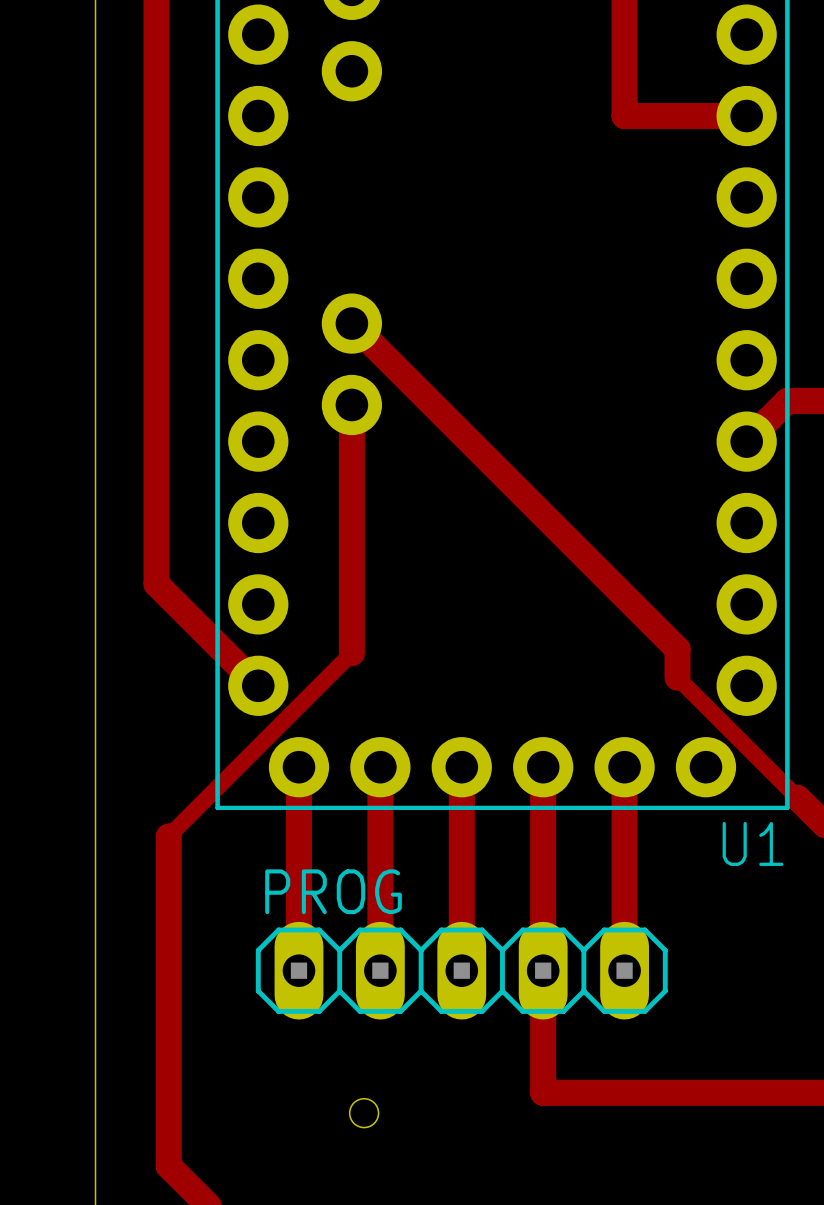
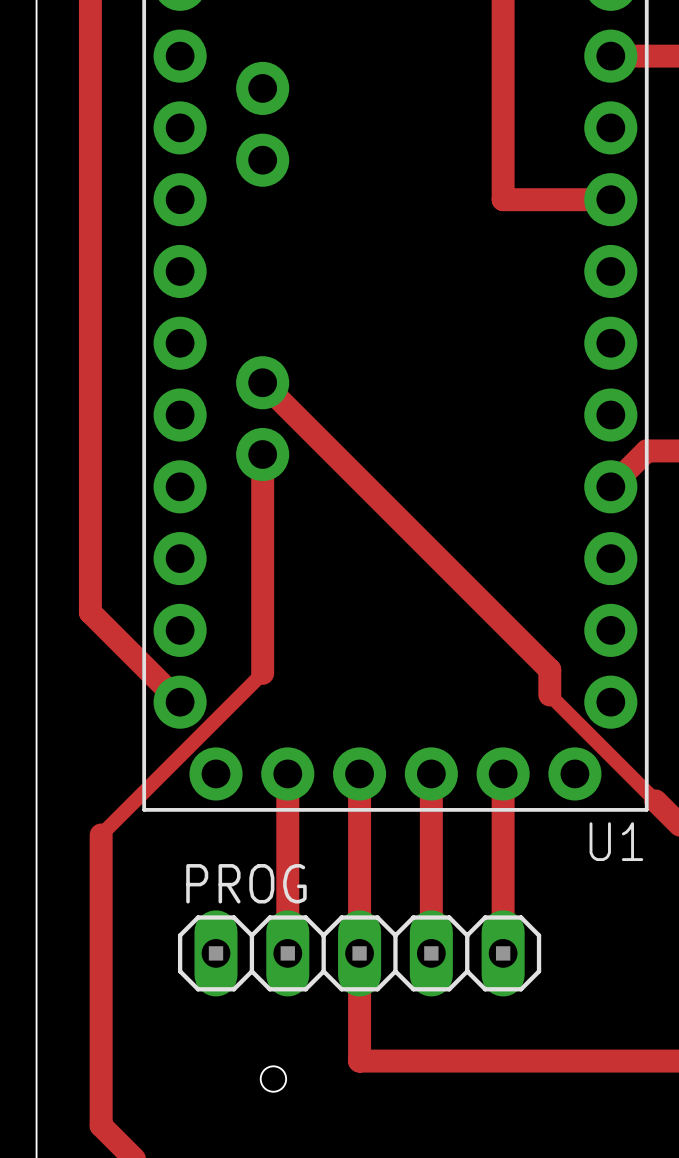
track: (298, 767) (298, 970) -> none
track: (543, 970) (543, 1092) -> (359, 953) (359, 1061) (431, 1061)

